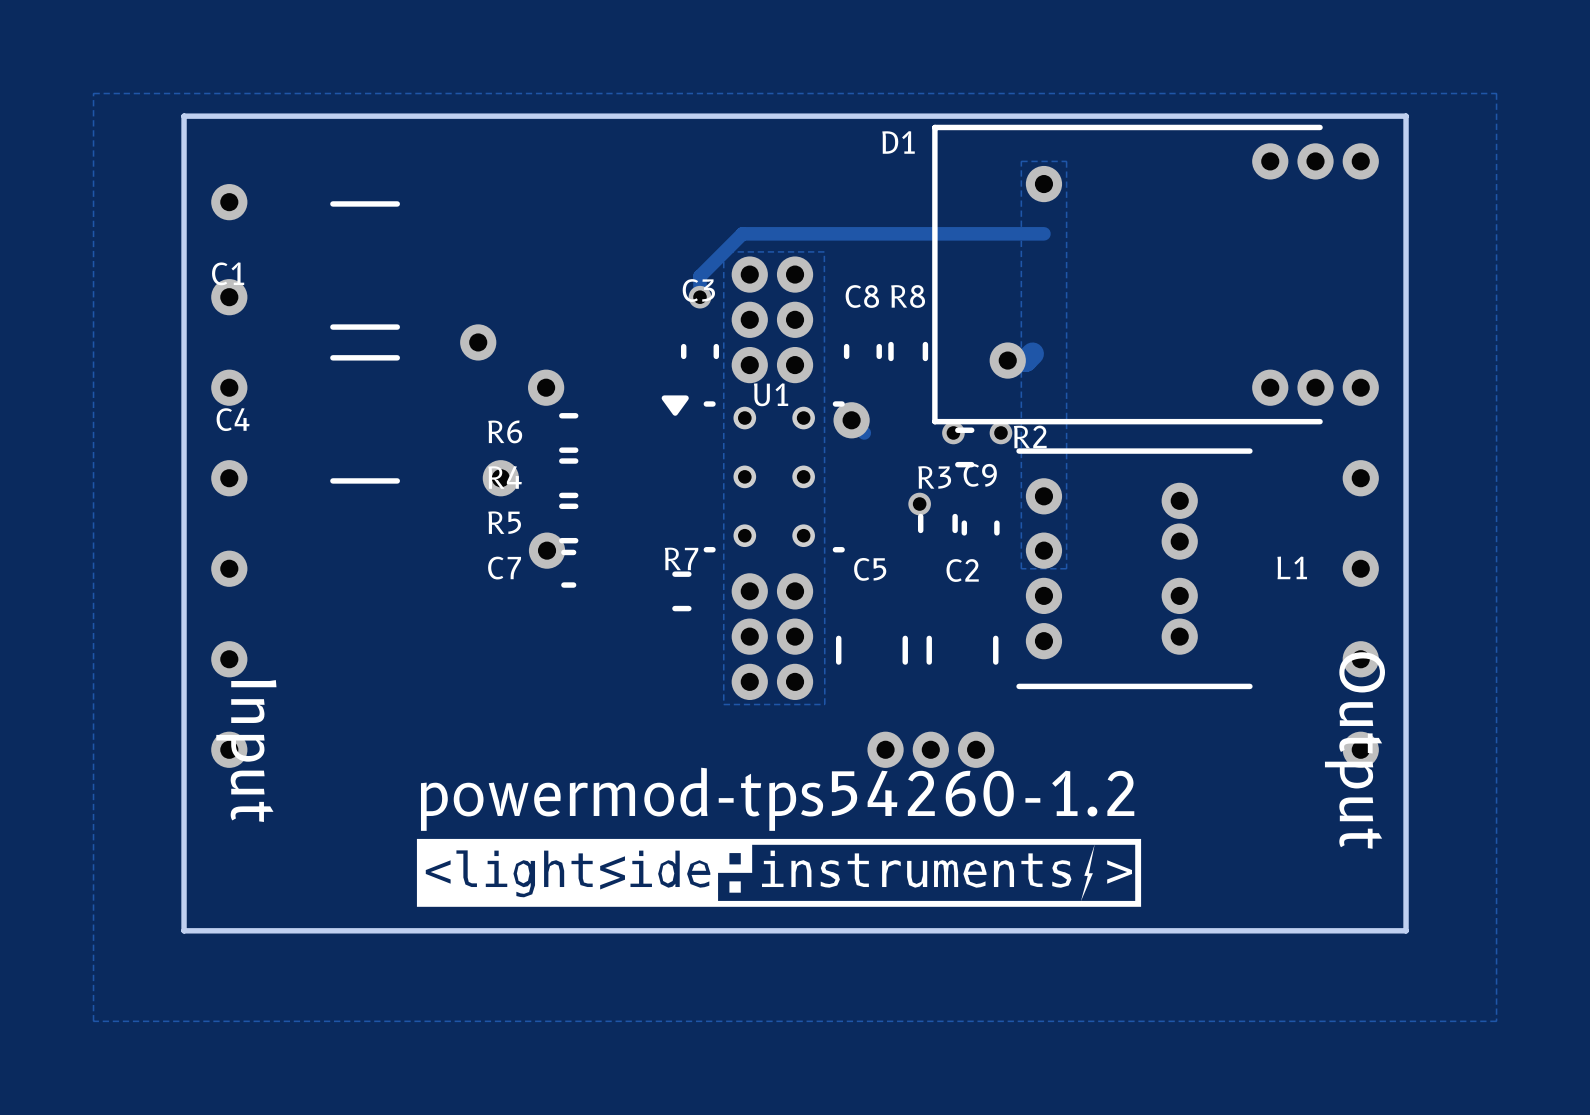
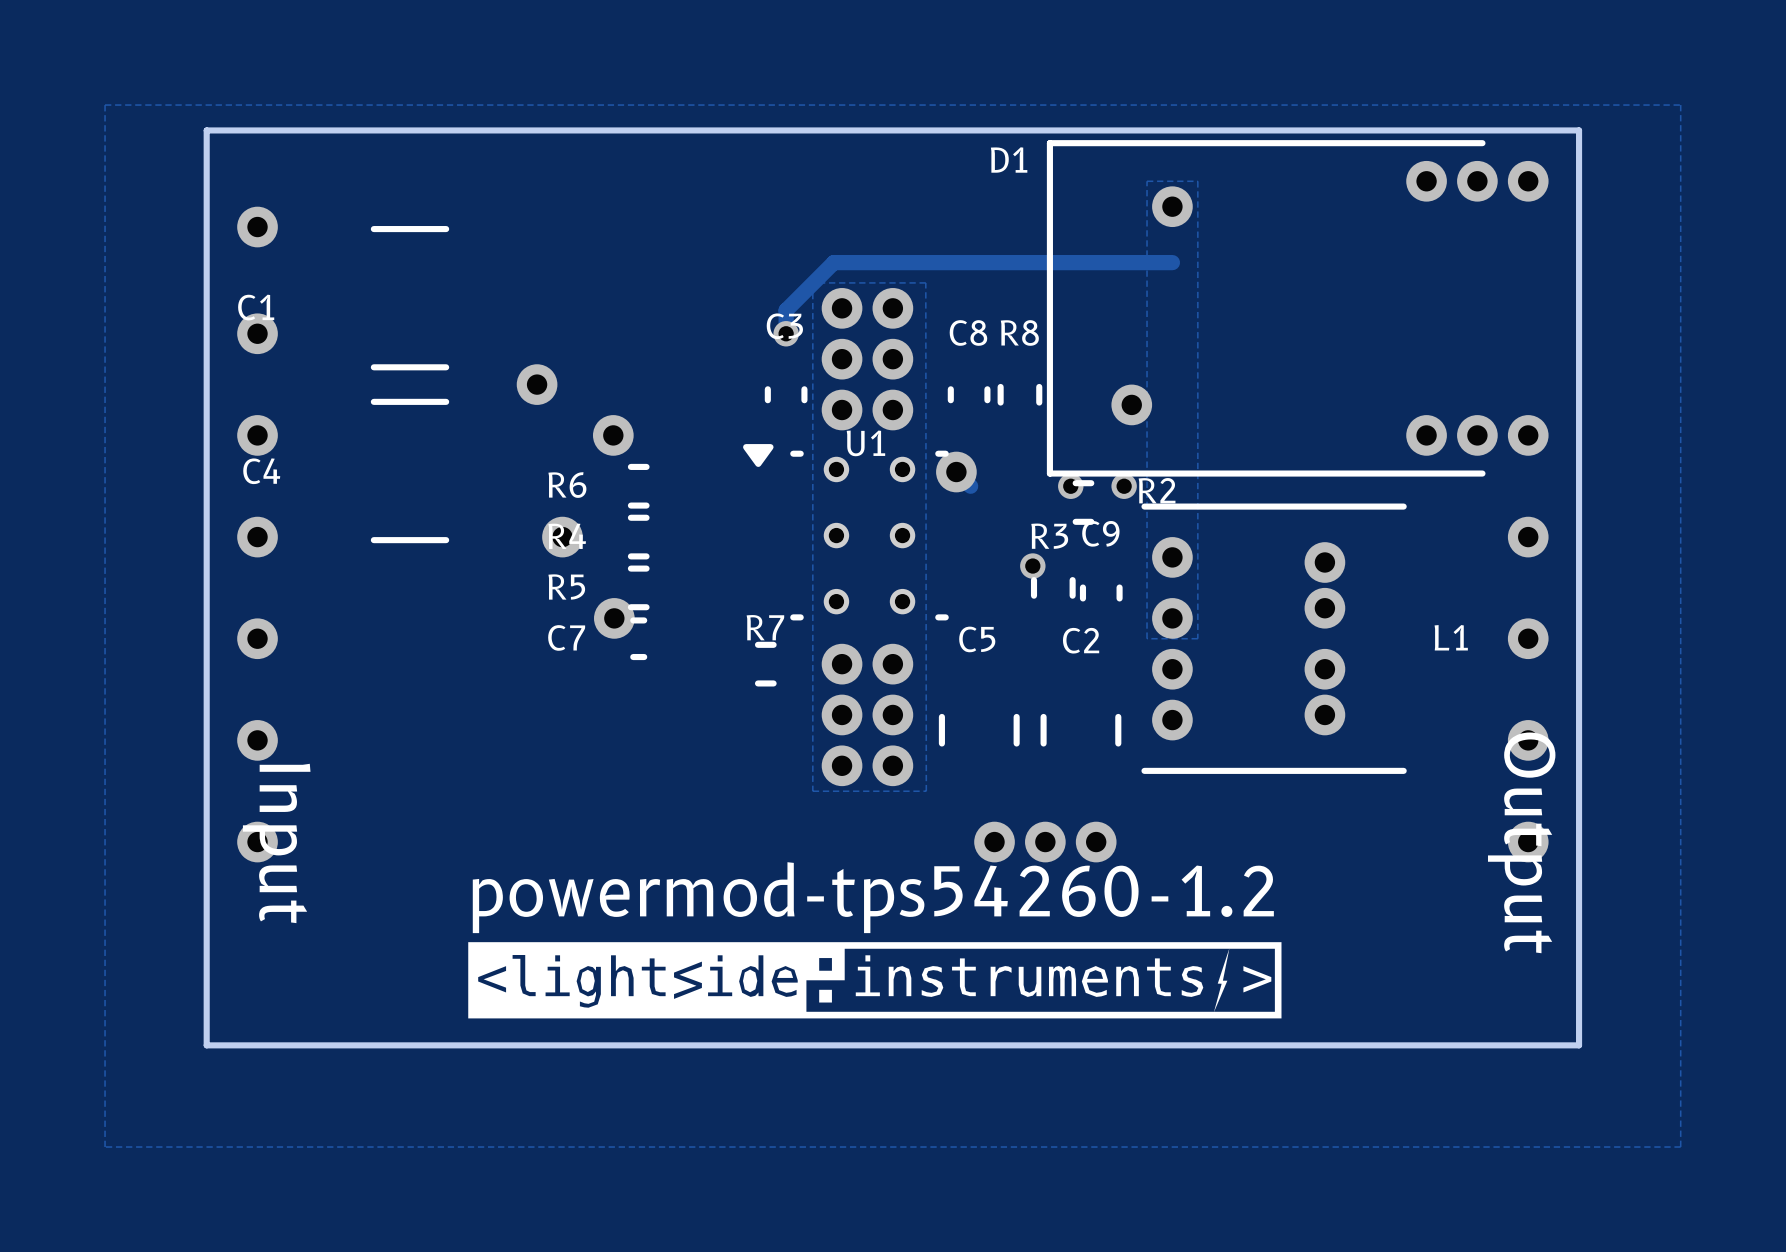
track: (1032, 353) (1025, 360) (1007, 360) -> none

